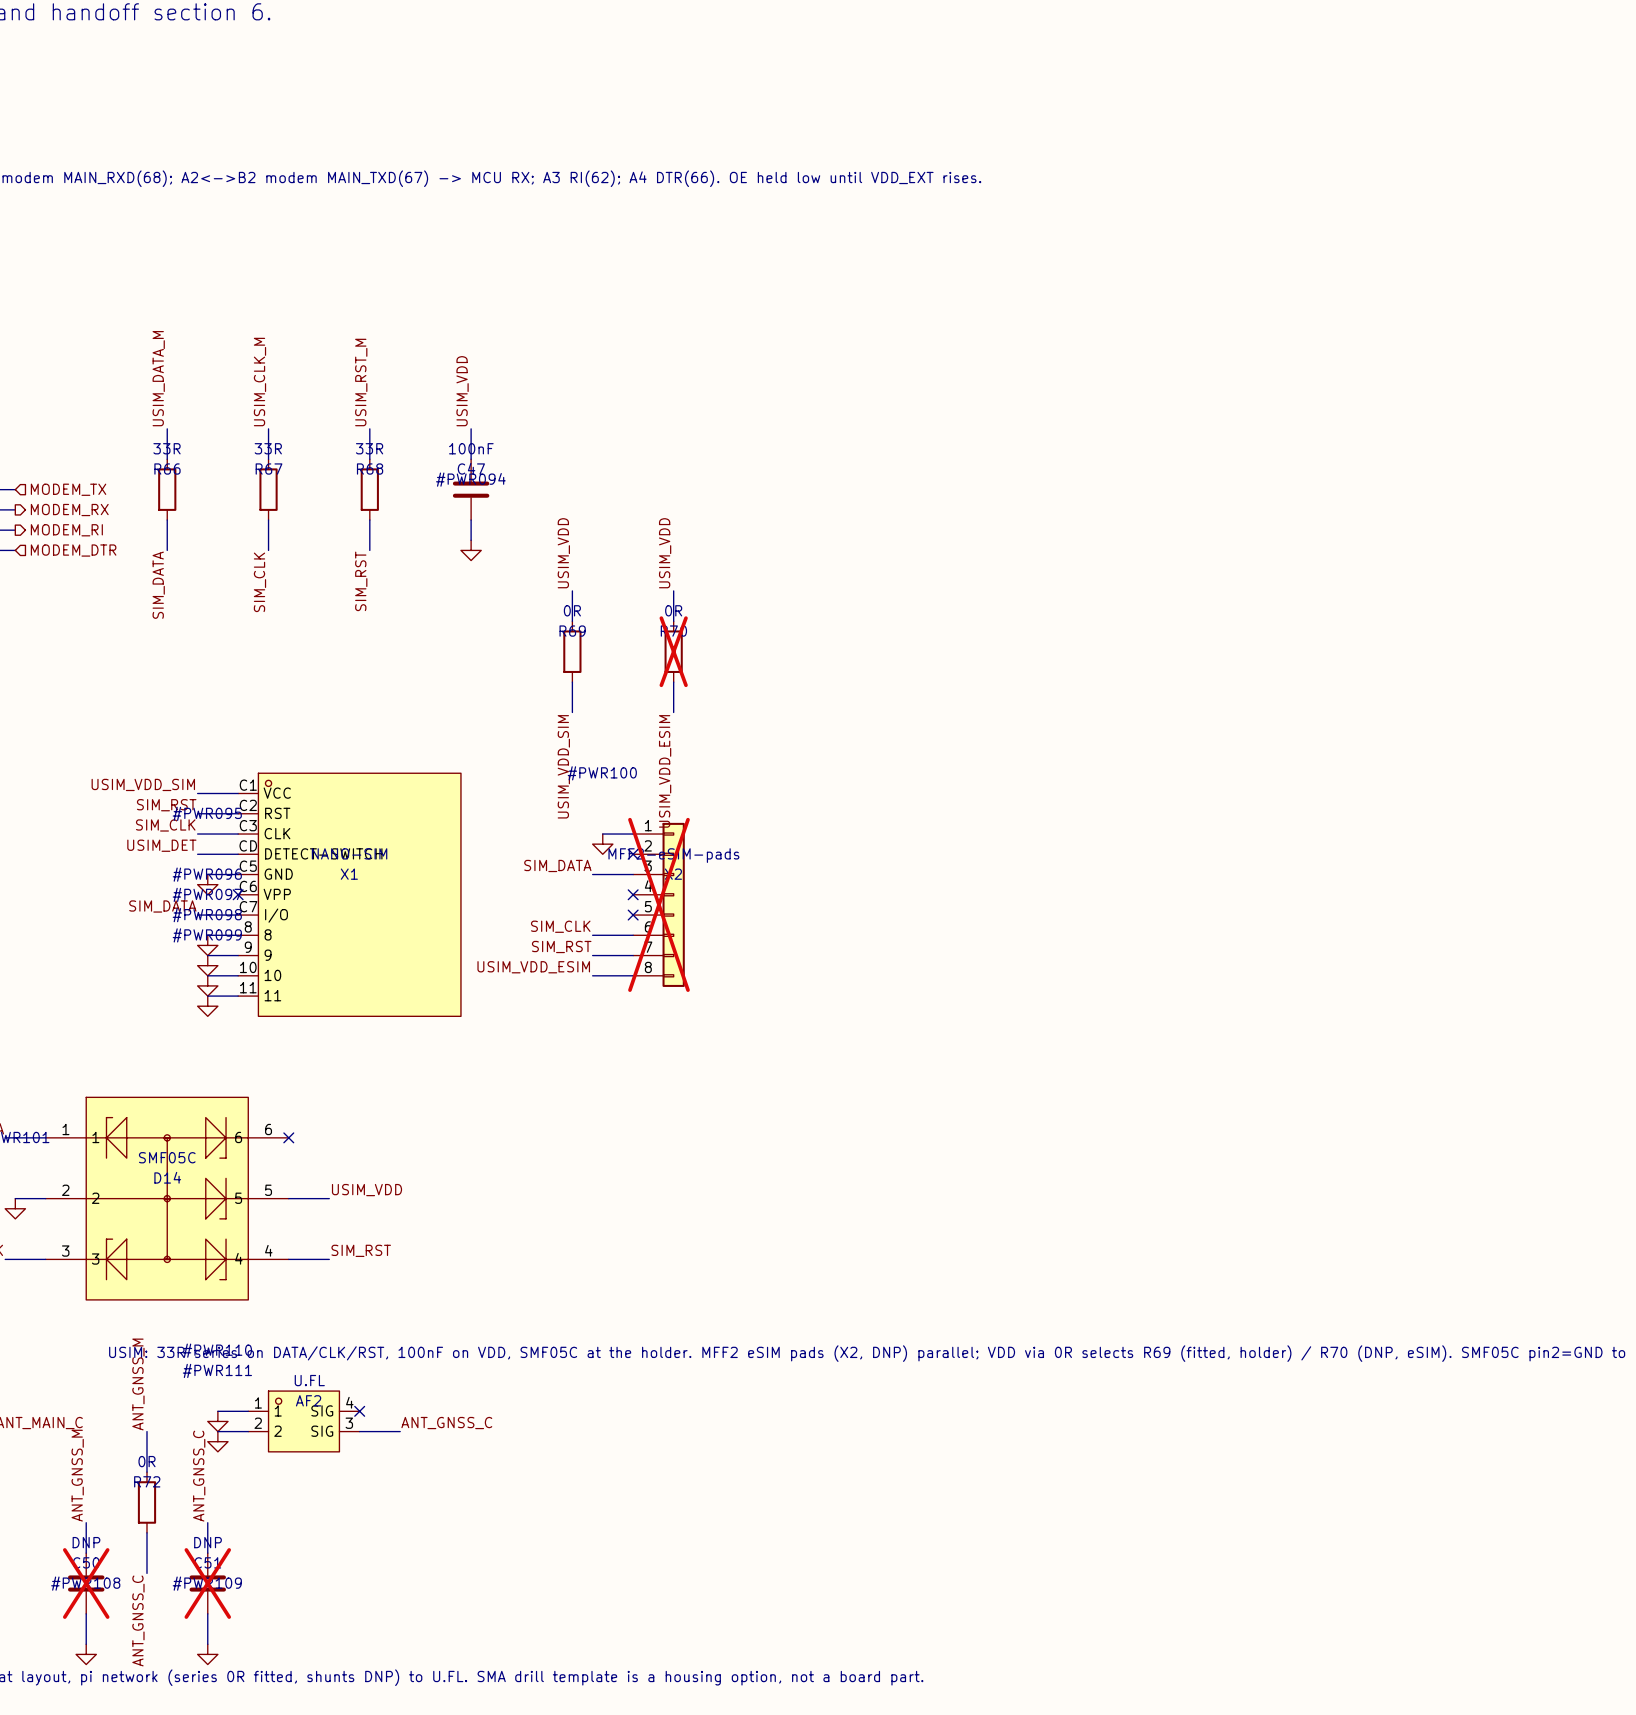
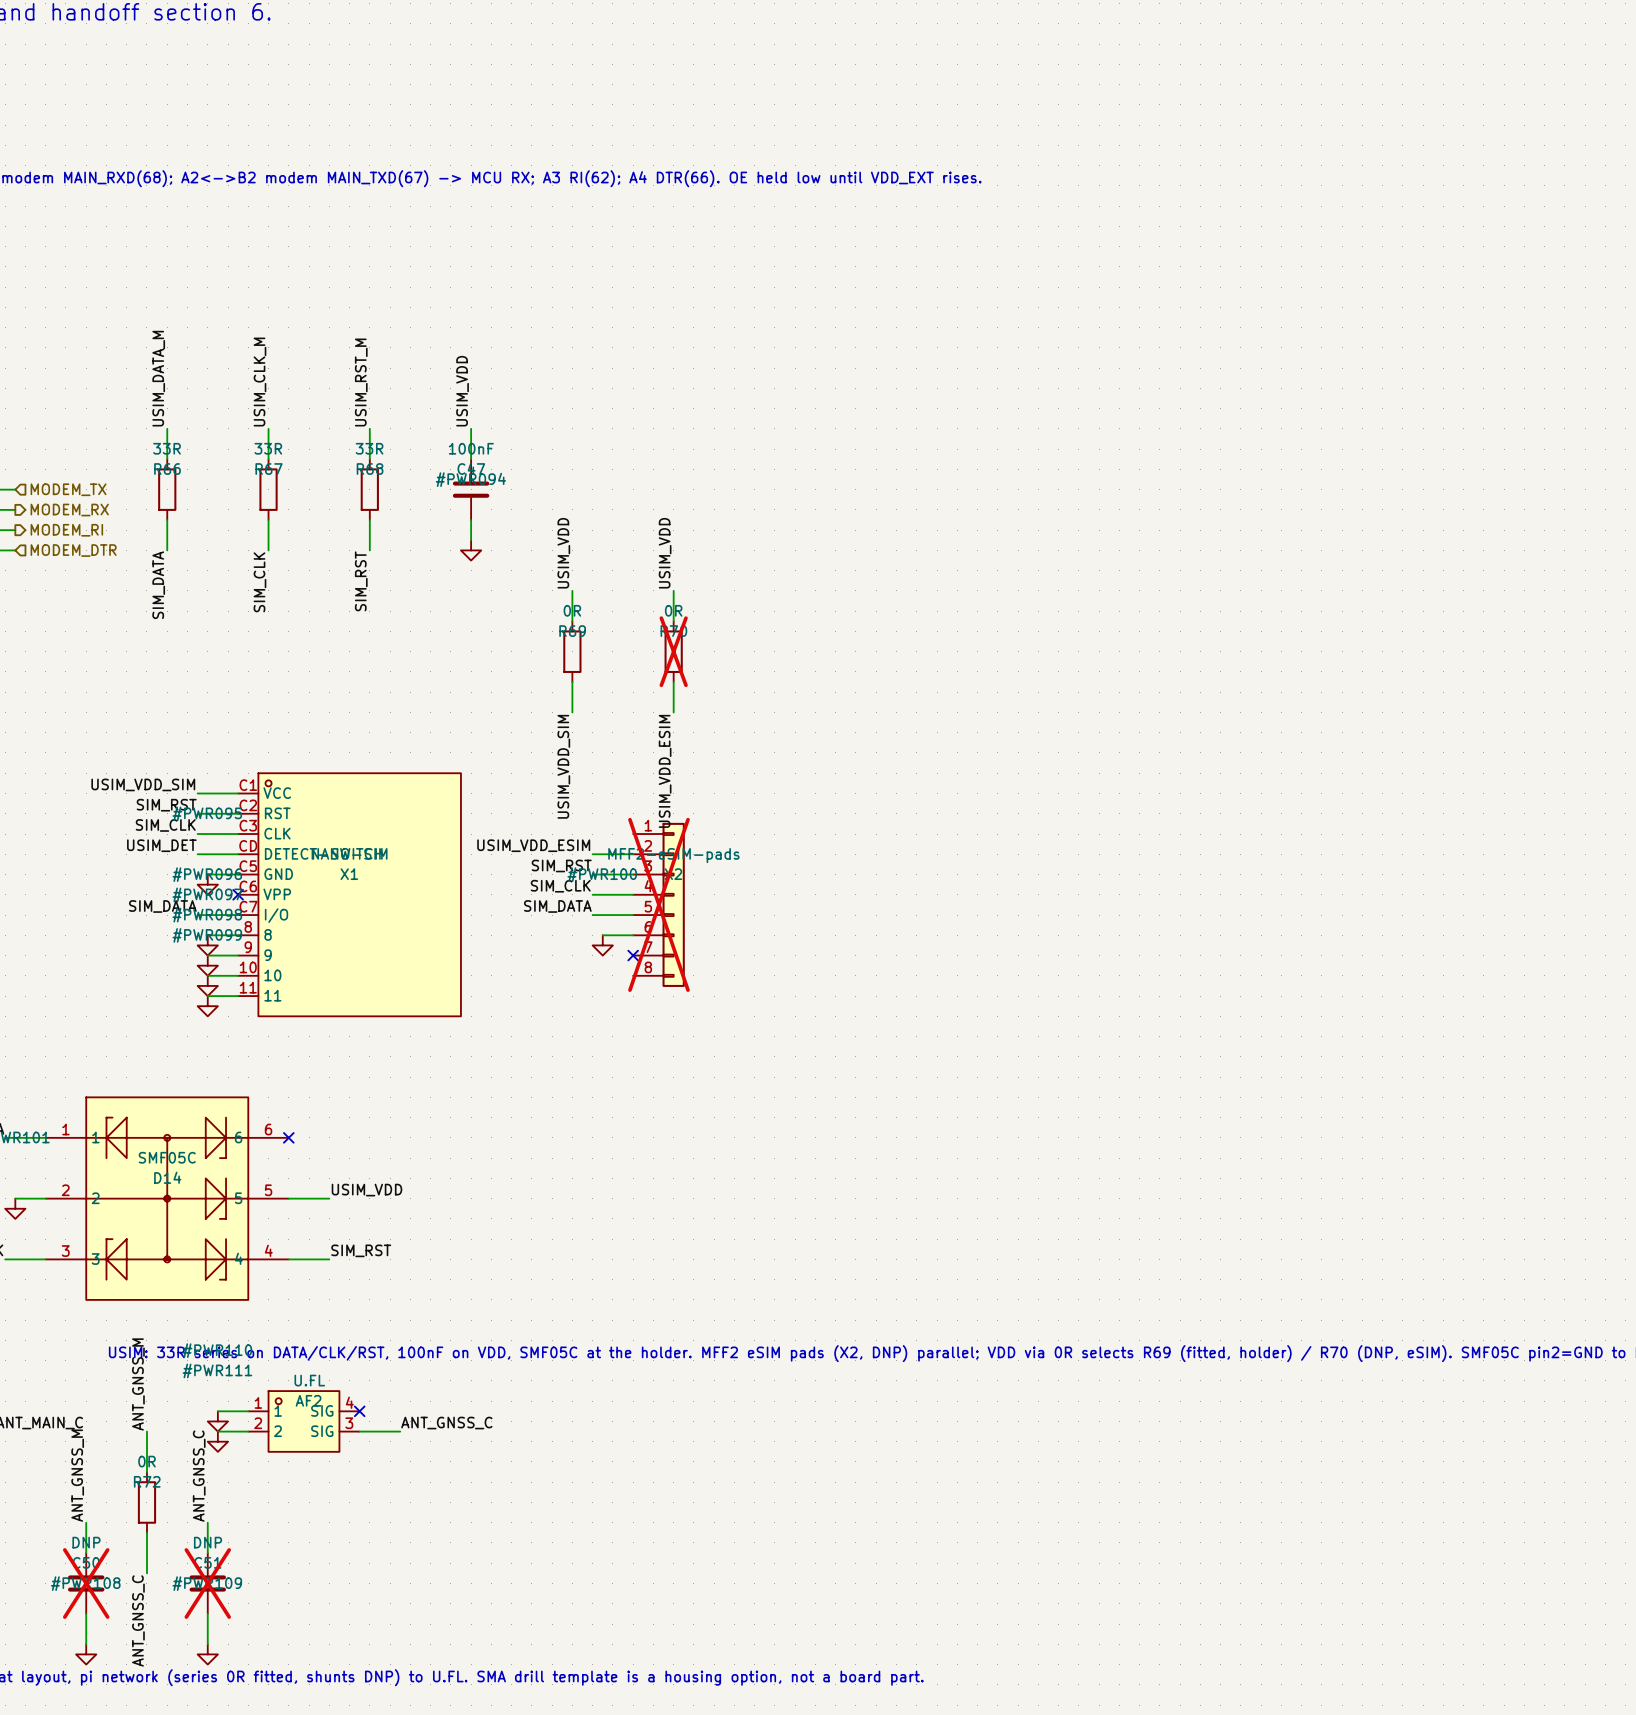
wire: (602, 834) (633, 834) -> none
#PWR100 position: (602, 844) -> (602, 945)
wire: none -> (592, 854) (633, 854)
no-connect mark: (633, 854) -> none
label: SIM_DATA (557, 865) -> SIM_RST (561, 865)
no-connect mark: (633, 894) -> none
label: none -> SIM_DATA (557, 906)
no-connect mark: (633, 915) -> none
label position: SIM_CLK (560, 926) -> SIM_CLK (560, 886)
wire: (592, 935) (602, 935) -> none
label: SIM_RST (561, 946) -> none
wire: (592, 955) (633, 955) -> (592, 894) (633, 894)
no-connect mark: none -> (633, 955)
label position: USIM_VDD_ESIM (533, 967) -> USIM_VDD_ESIM (533, 845)
wire: (592, 975) (633, 975) -> (592, 915) (633, 915)

